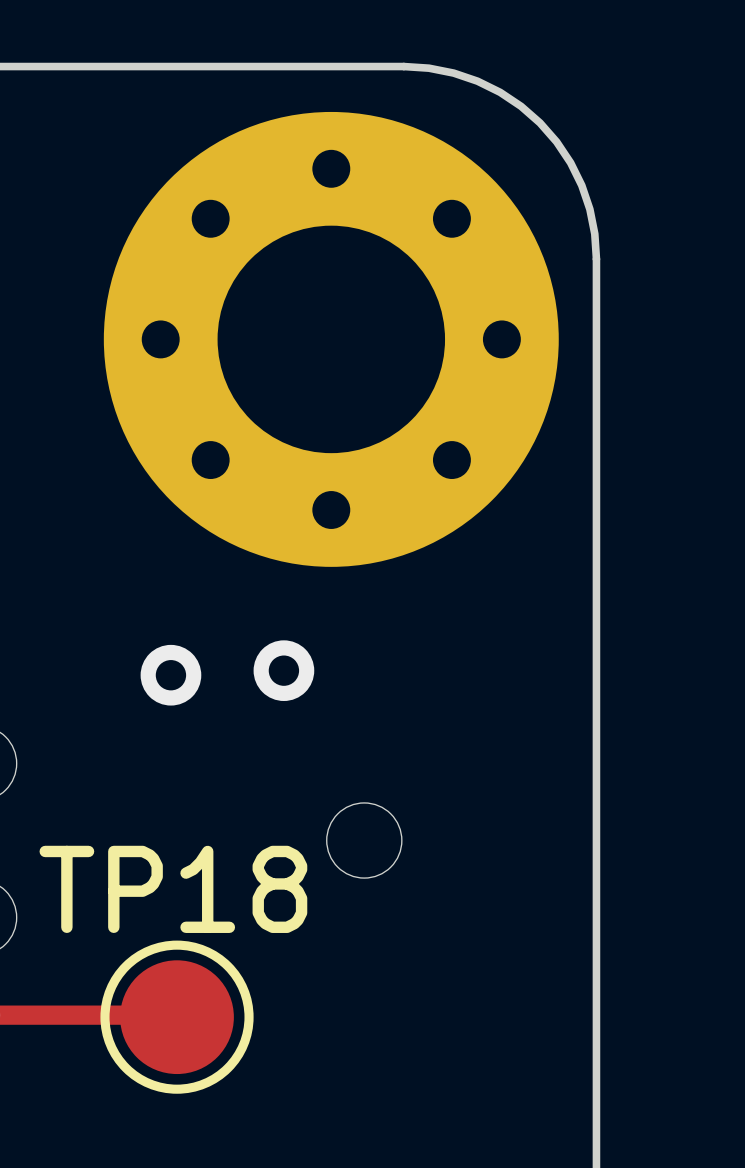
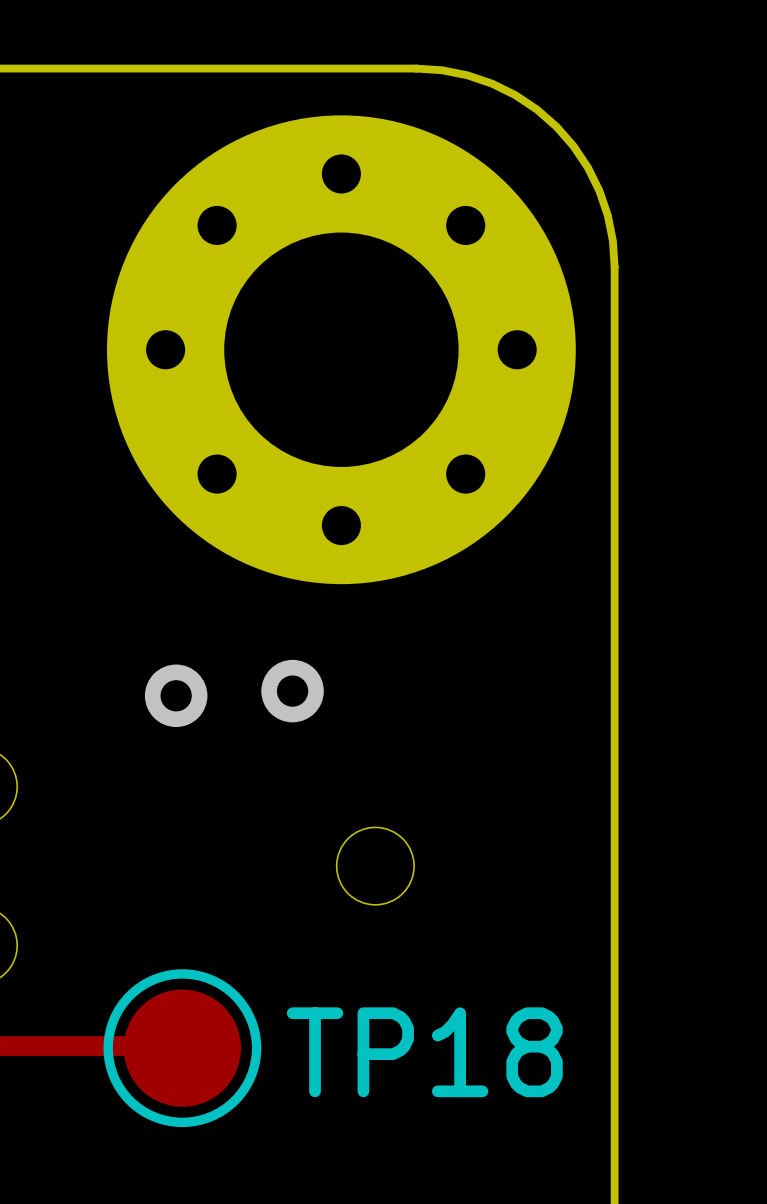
TP18 name position: TP18 (173, 889) -> TP18 (424, 1052)

